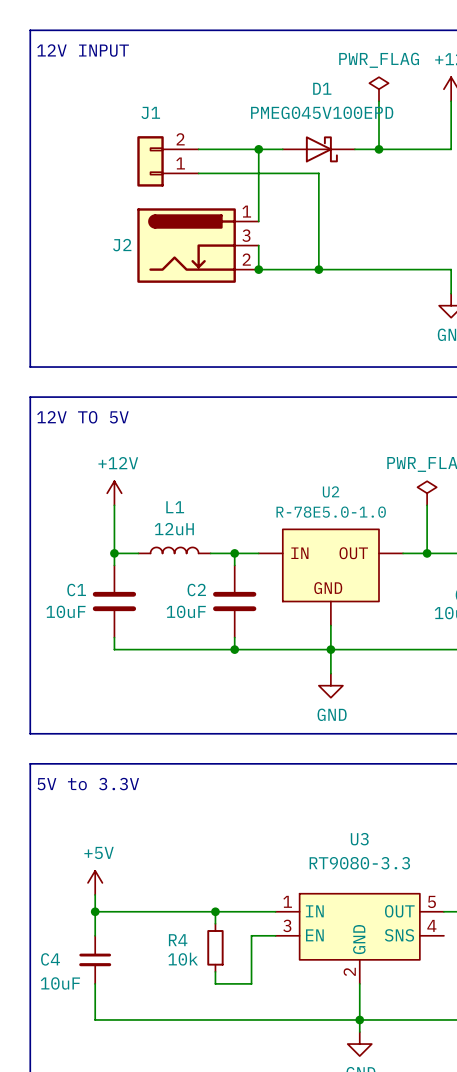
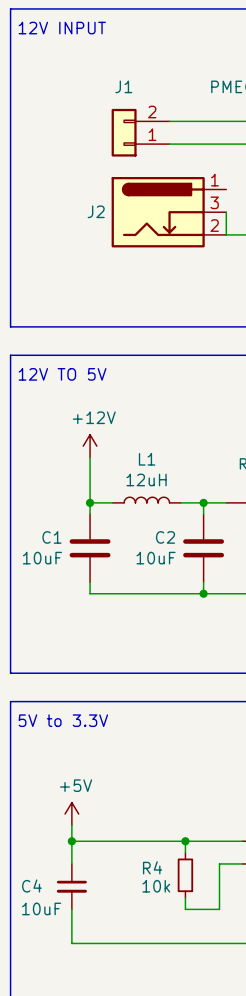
wire: (258, 149) (258, 221) -> none
junction: (258, 149) -> none
junction: (258, 269) -> none

